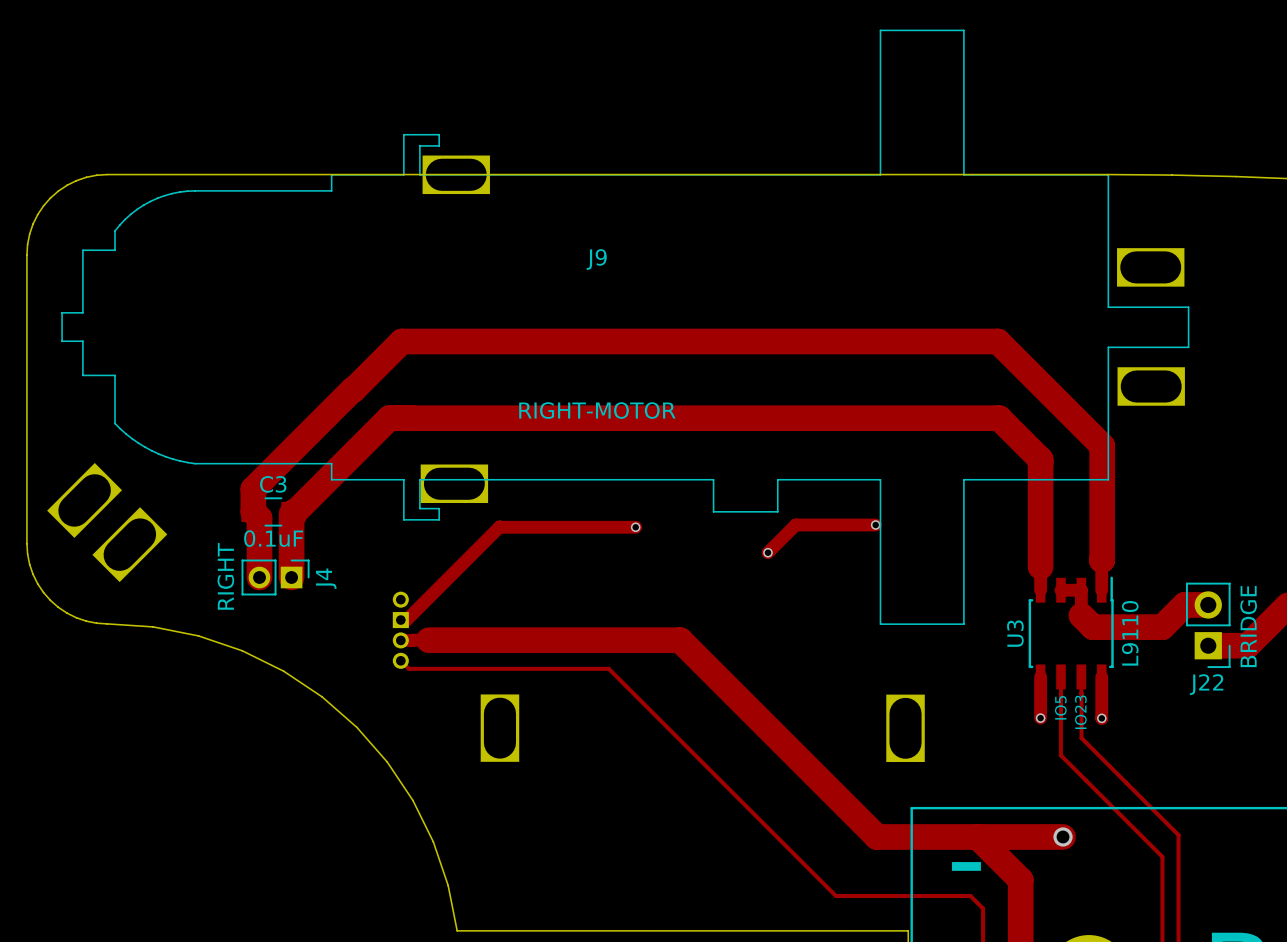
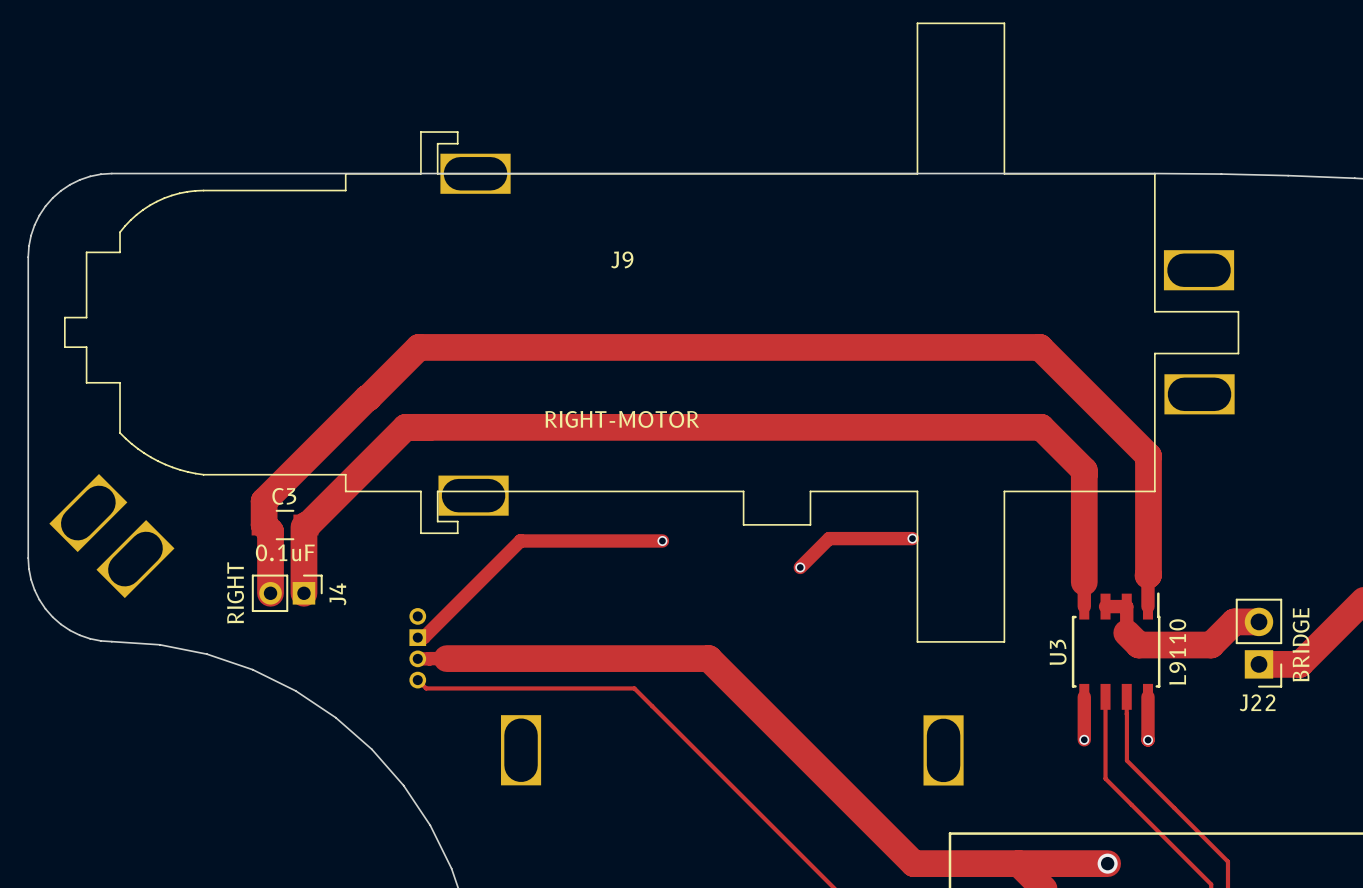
text: IO5 (1060, 707) -> none
text: IO23 (1080, 712) -> none

